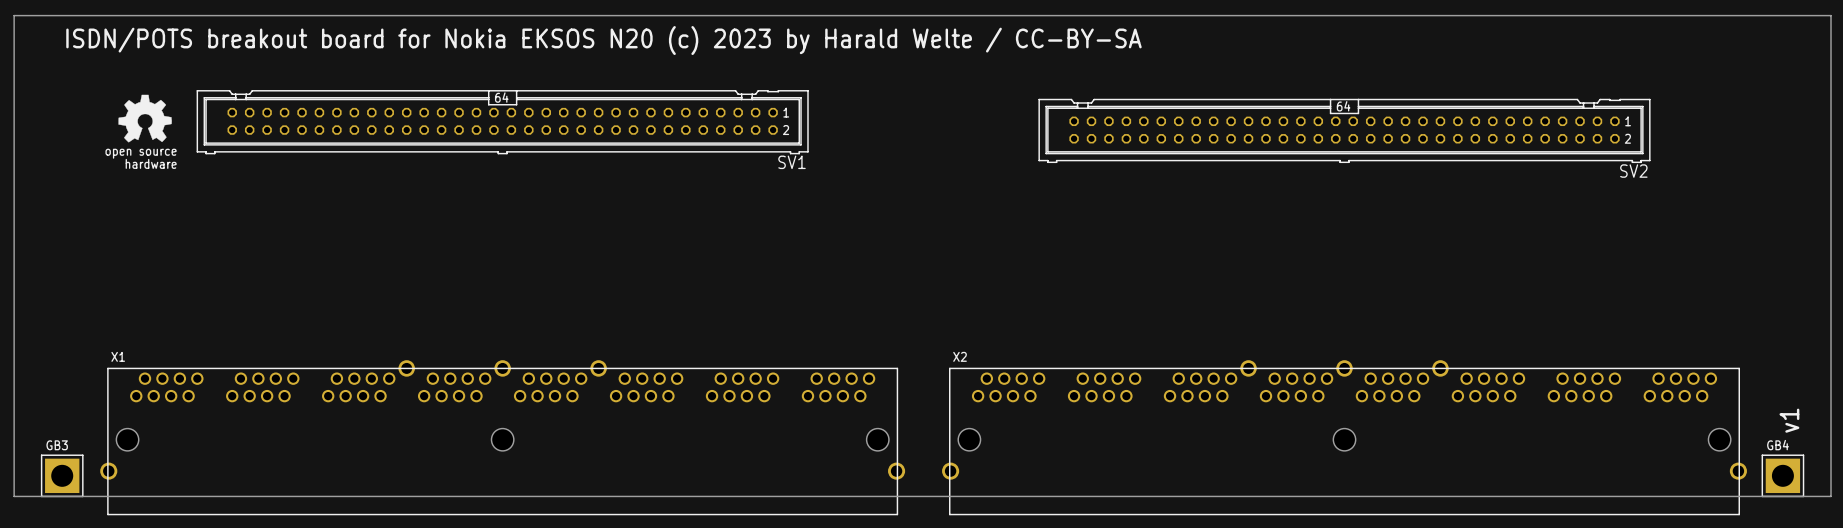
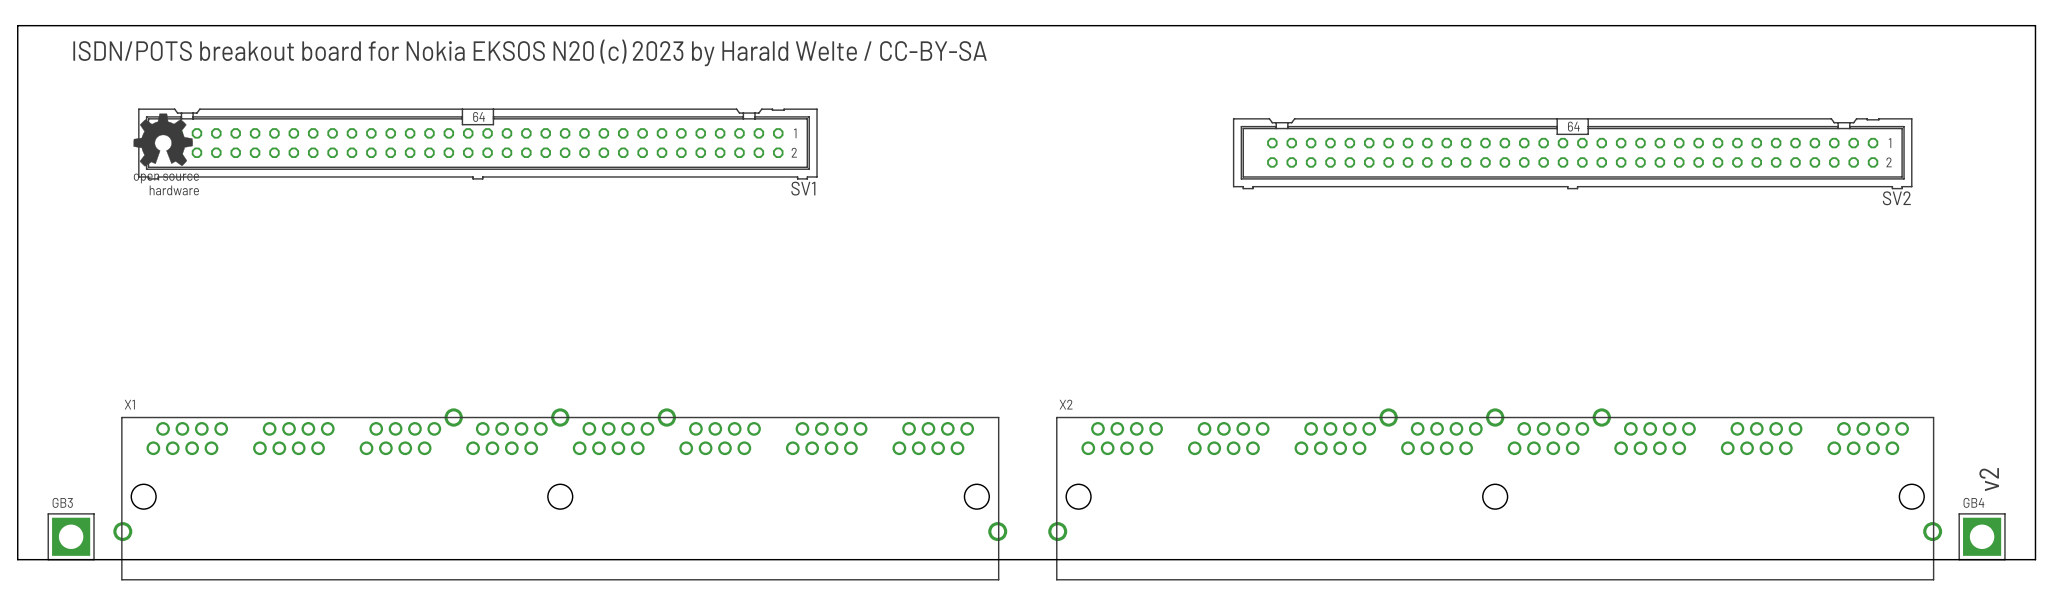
SV1 position: (502, 122) -> (477, 144)
SV2 position: (1344, 130) -> (1572, 153)
text: v1 (1789, 420) -> v2 (1989, 479)

